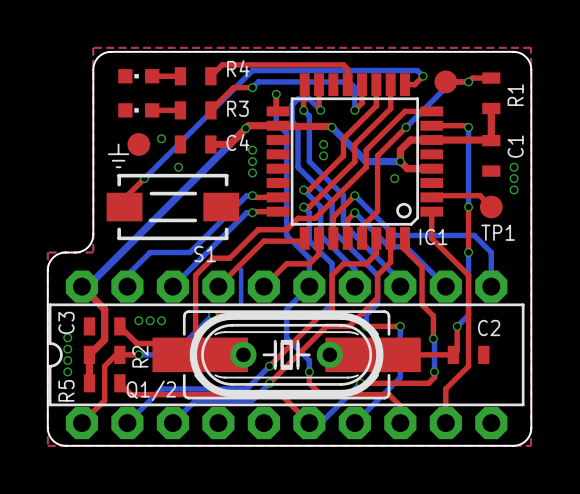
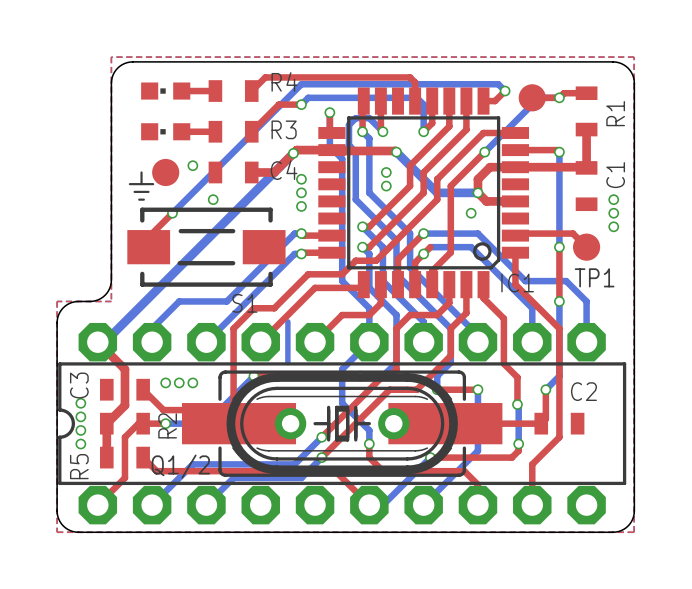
bottom track: (354, 195) (394, 235) (440, 235) -> (423, 233) (477, 233) (525, 281)
top track: none -> (430, 247) (423, 253)
bottom track: (354, 212) (388, 246) (406, 246) (445, 286) -> (430, 247) (471, 247) (532, 308) (532, 342)

